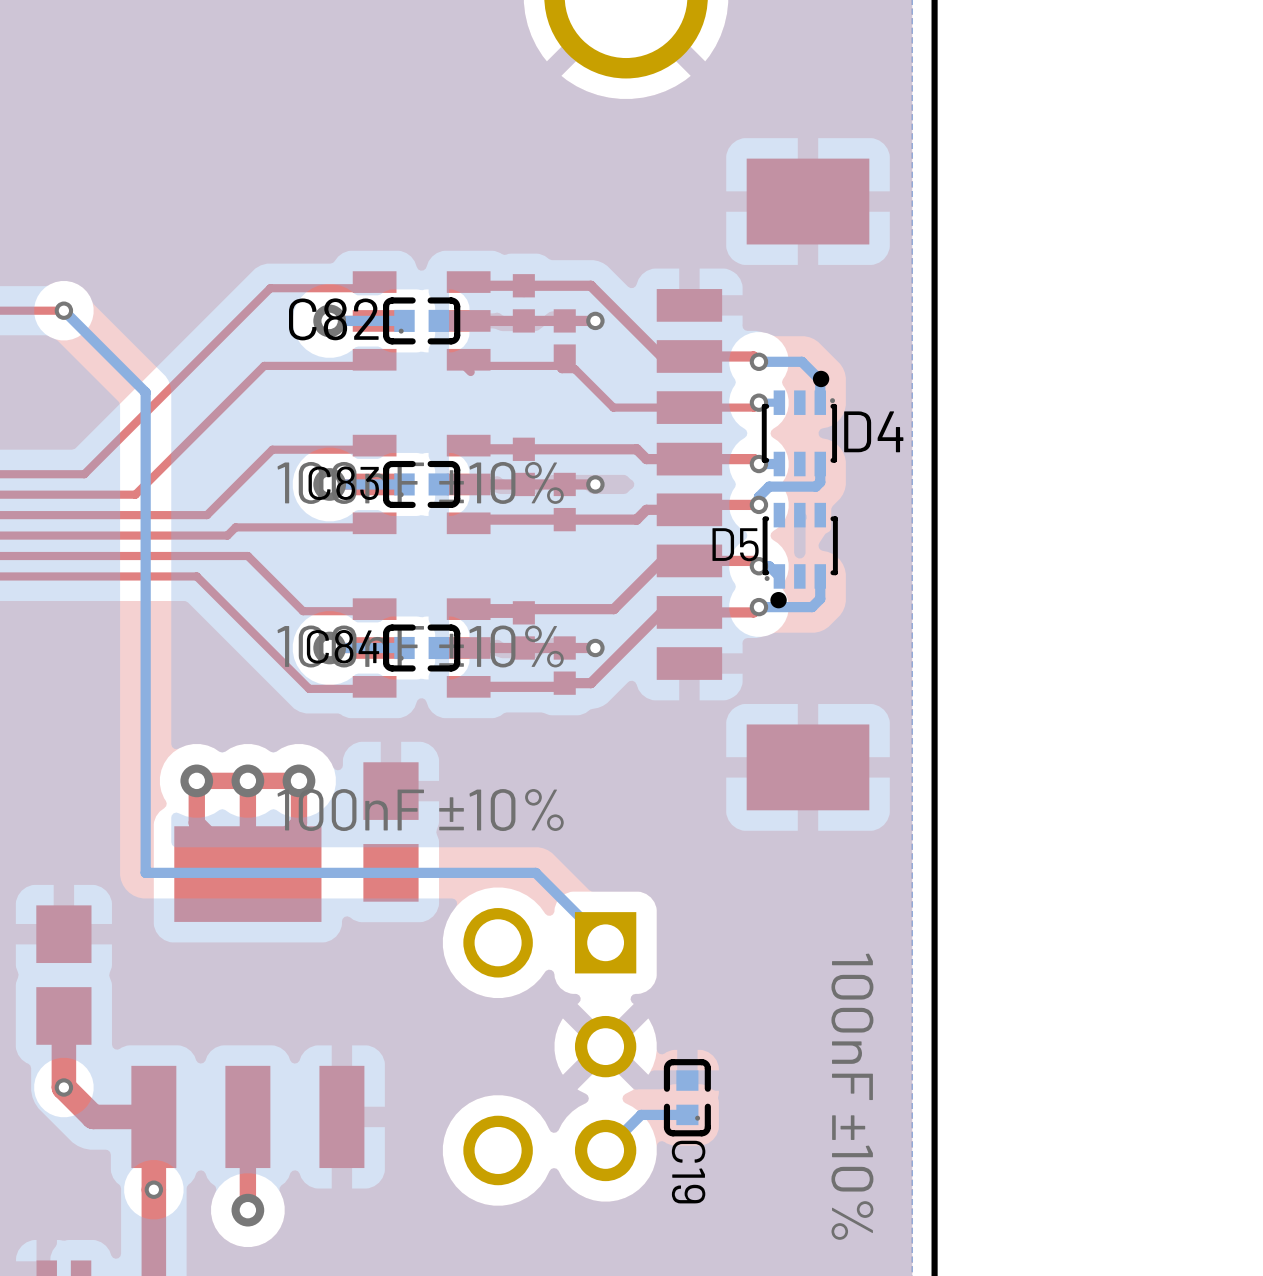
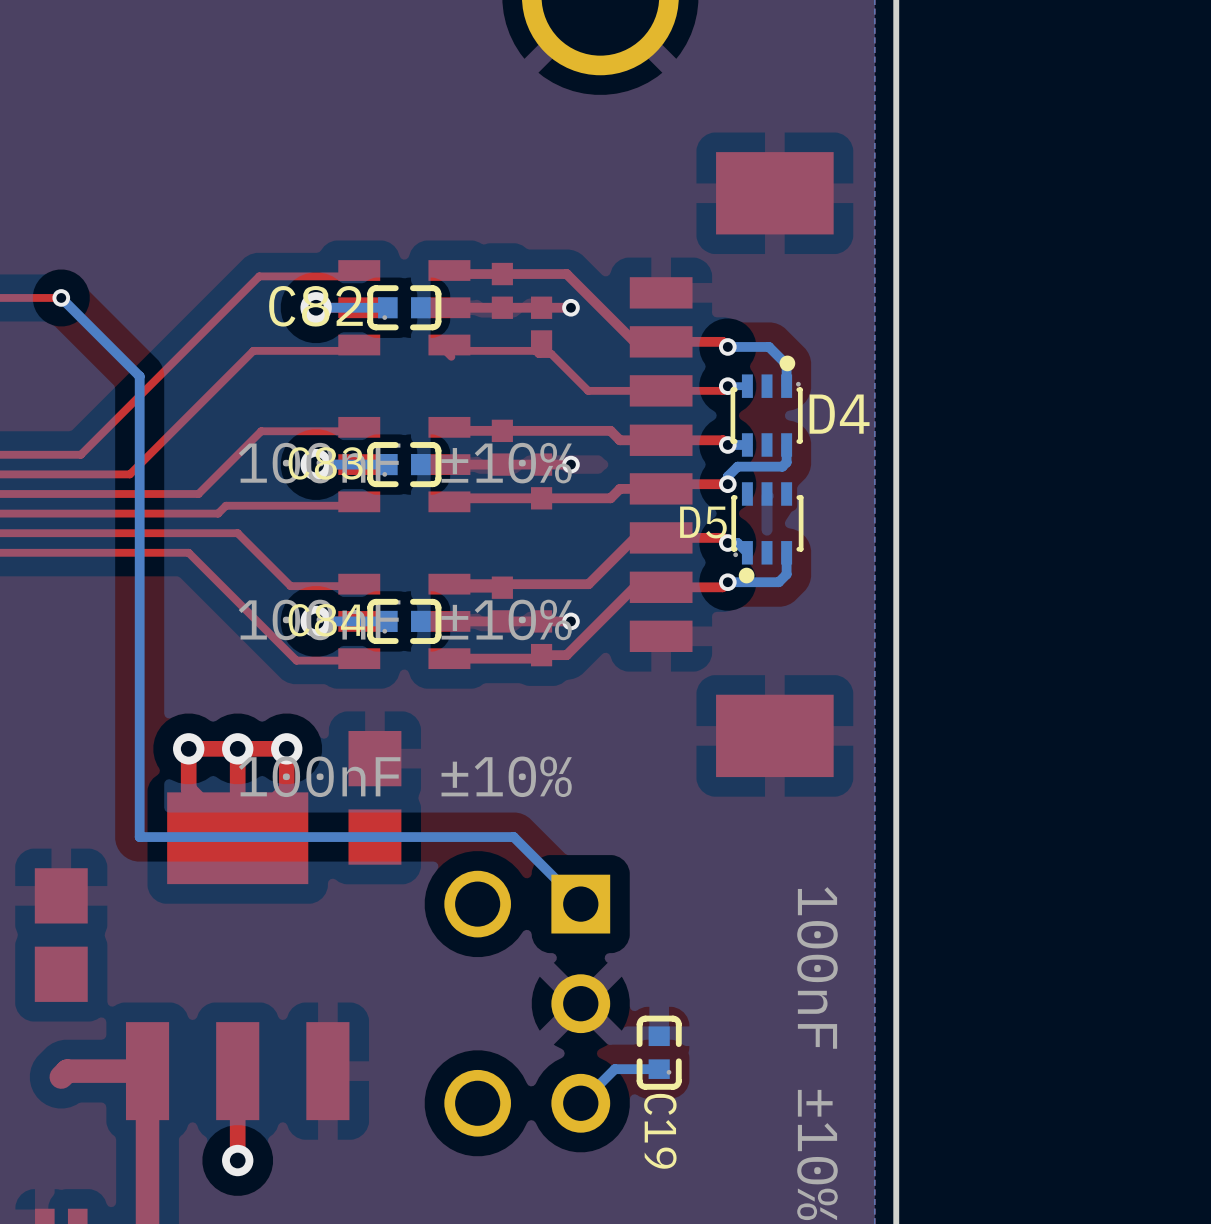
top track: (63, 1015) (63, 1087) (93, 1116) -> (61, 1077) (67, 1071) (89, 1071)
via: (63, 1087) -> none
via: (153, 1189) -> none

